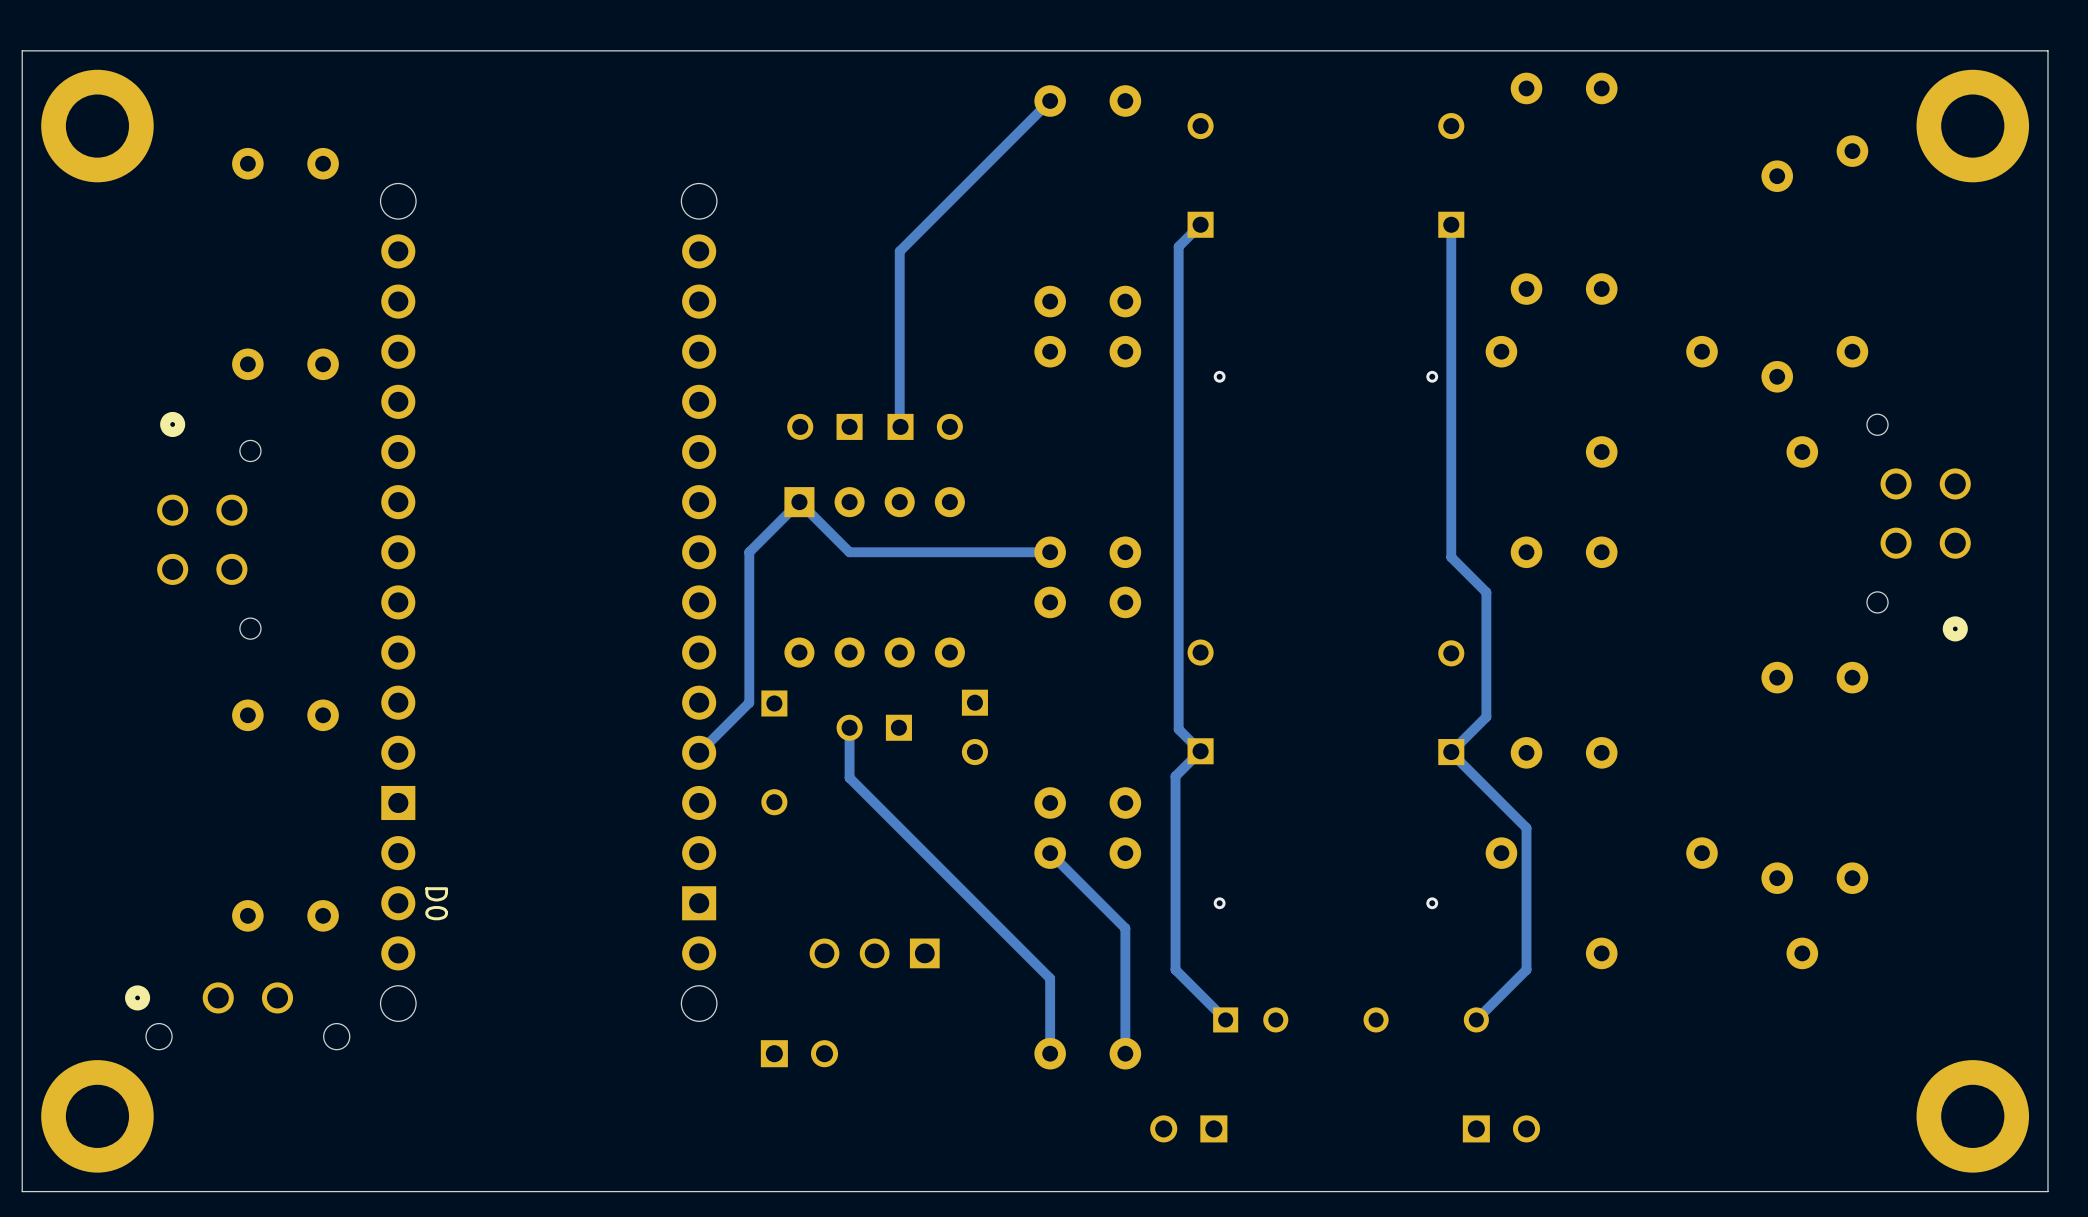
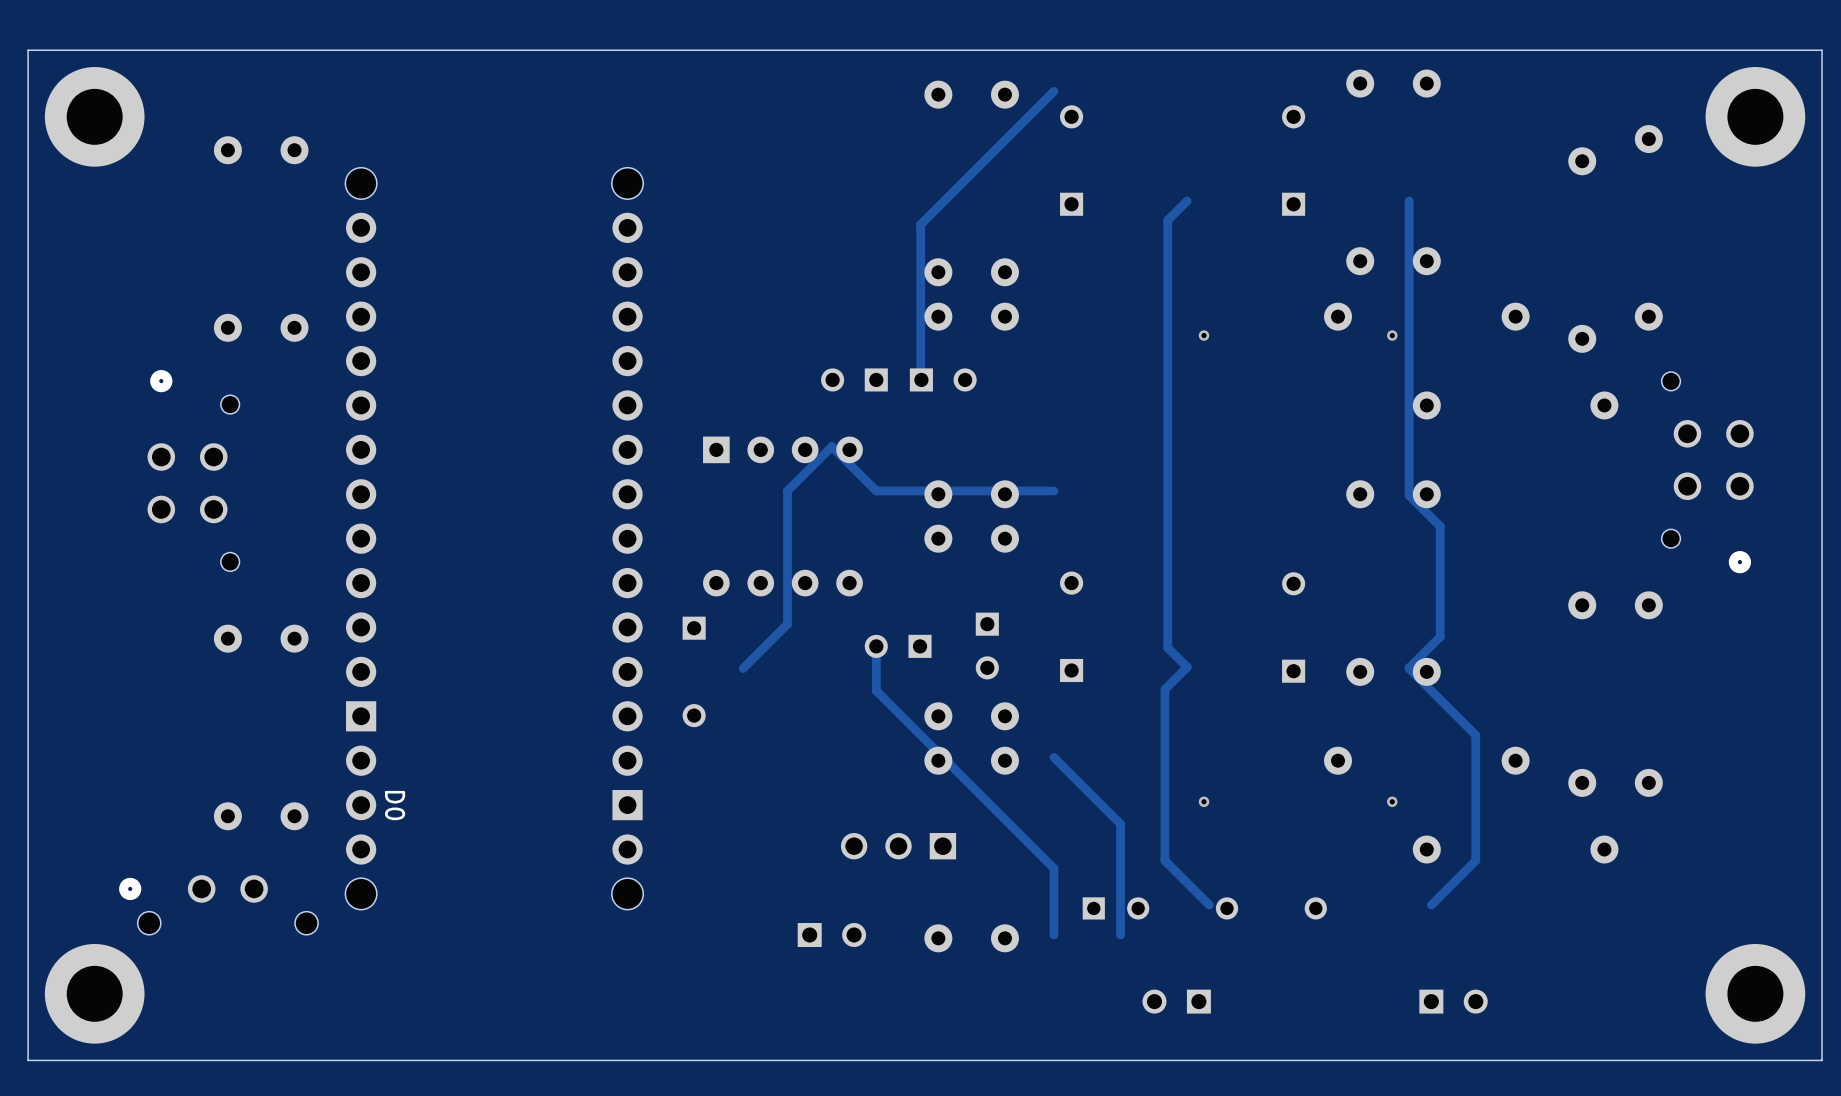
track: (1050, 100) (899, 251) (899, 426) -> (1053, 91) (920, 224) (920, 379)
track: (1200, 224) (1178, 246) (1178, 729) (1200, 751) (1175, 776) (1175, 969) (1225, 1019) -> (1187, 200) (1167, 220) (1167, 647) (1187, 667) (1164, 689) (1164, 860) (1209, 905)
track: (1451, 224) (1451, 557) (1486, 592) (1486, 716) (1451, 752) (1526, 828) (1526, 969) (1476, 1019) -> (1409, 200) (1409, 495) (1440, 526) (1440, 636) (1409, 668) (1475, 735) (1475, 860) (1431, 905)
via: none -> (1204, 335)
via: none -> (1392, 335)
via: (1219, 376) -> none
via: (1432, 376) -> none
part: none -> (943, 379)
part: (824, 426) -> none
part rotation: 0° (925, 426) -> 180° (854, 379)
track: (1050, 552) (849, 552) (799, 502) (749, 552) (749, 702) (699, 752) -> (1053, 490) (876, 490) (831, 446) (787, 490) (787, 624) (743, 668)
part: none -> (987, 646)
track: (849, 727) (849, 777) (1050, 978) (1050, 1053) -> (876, 646) (876, 690) (1053, 868) (1053, 935)
part: (874, 727) -> none
part rotation: 0° (974, 727) -> 90° clockwise (898, 646)
track: (1050, 853) (1125, 928) (1125, 1053) -> (1053, 757) (1120, 823) (1120, 935)
via: none -> (1204, 801)
via: none -> (1392, 801)
via: (1219, 903) -> none
via: (1432, 903) -> none
part position: (874, 953) -> (898, 846)
part position: (799, 1053) -> (831, 935)
part: none -> (1176, 1001)
part: none -> (1453, 1001)
part: (1188, 1128) -> none
part: (1501, 1128) -> none

